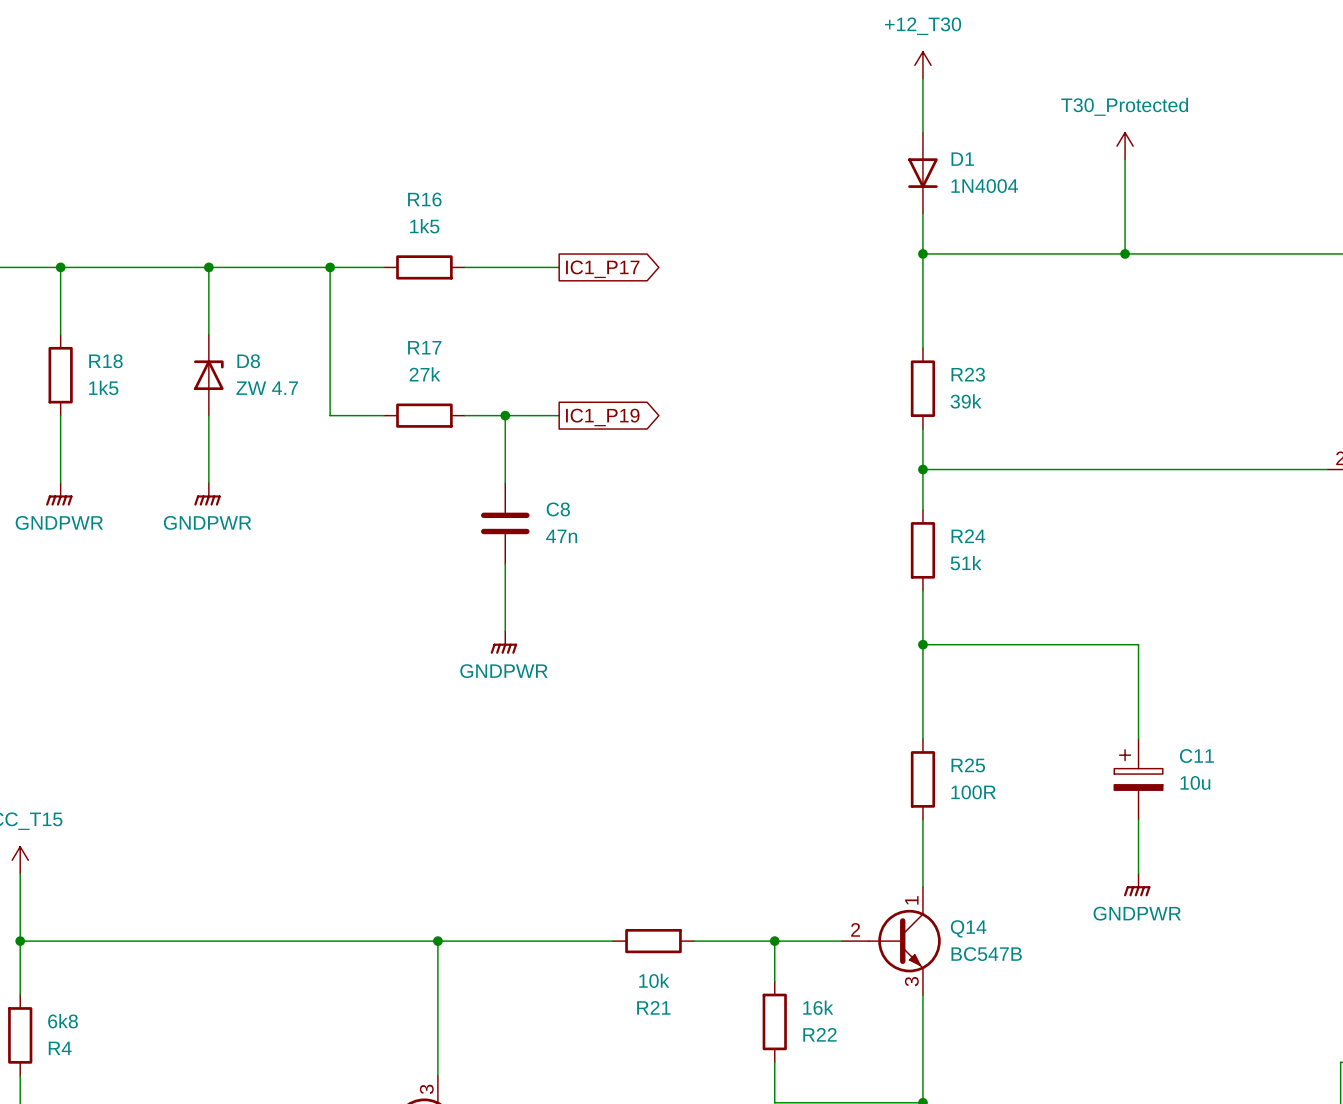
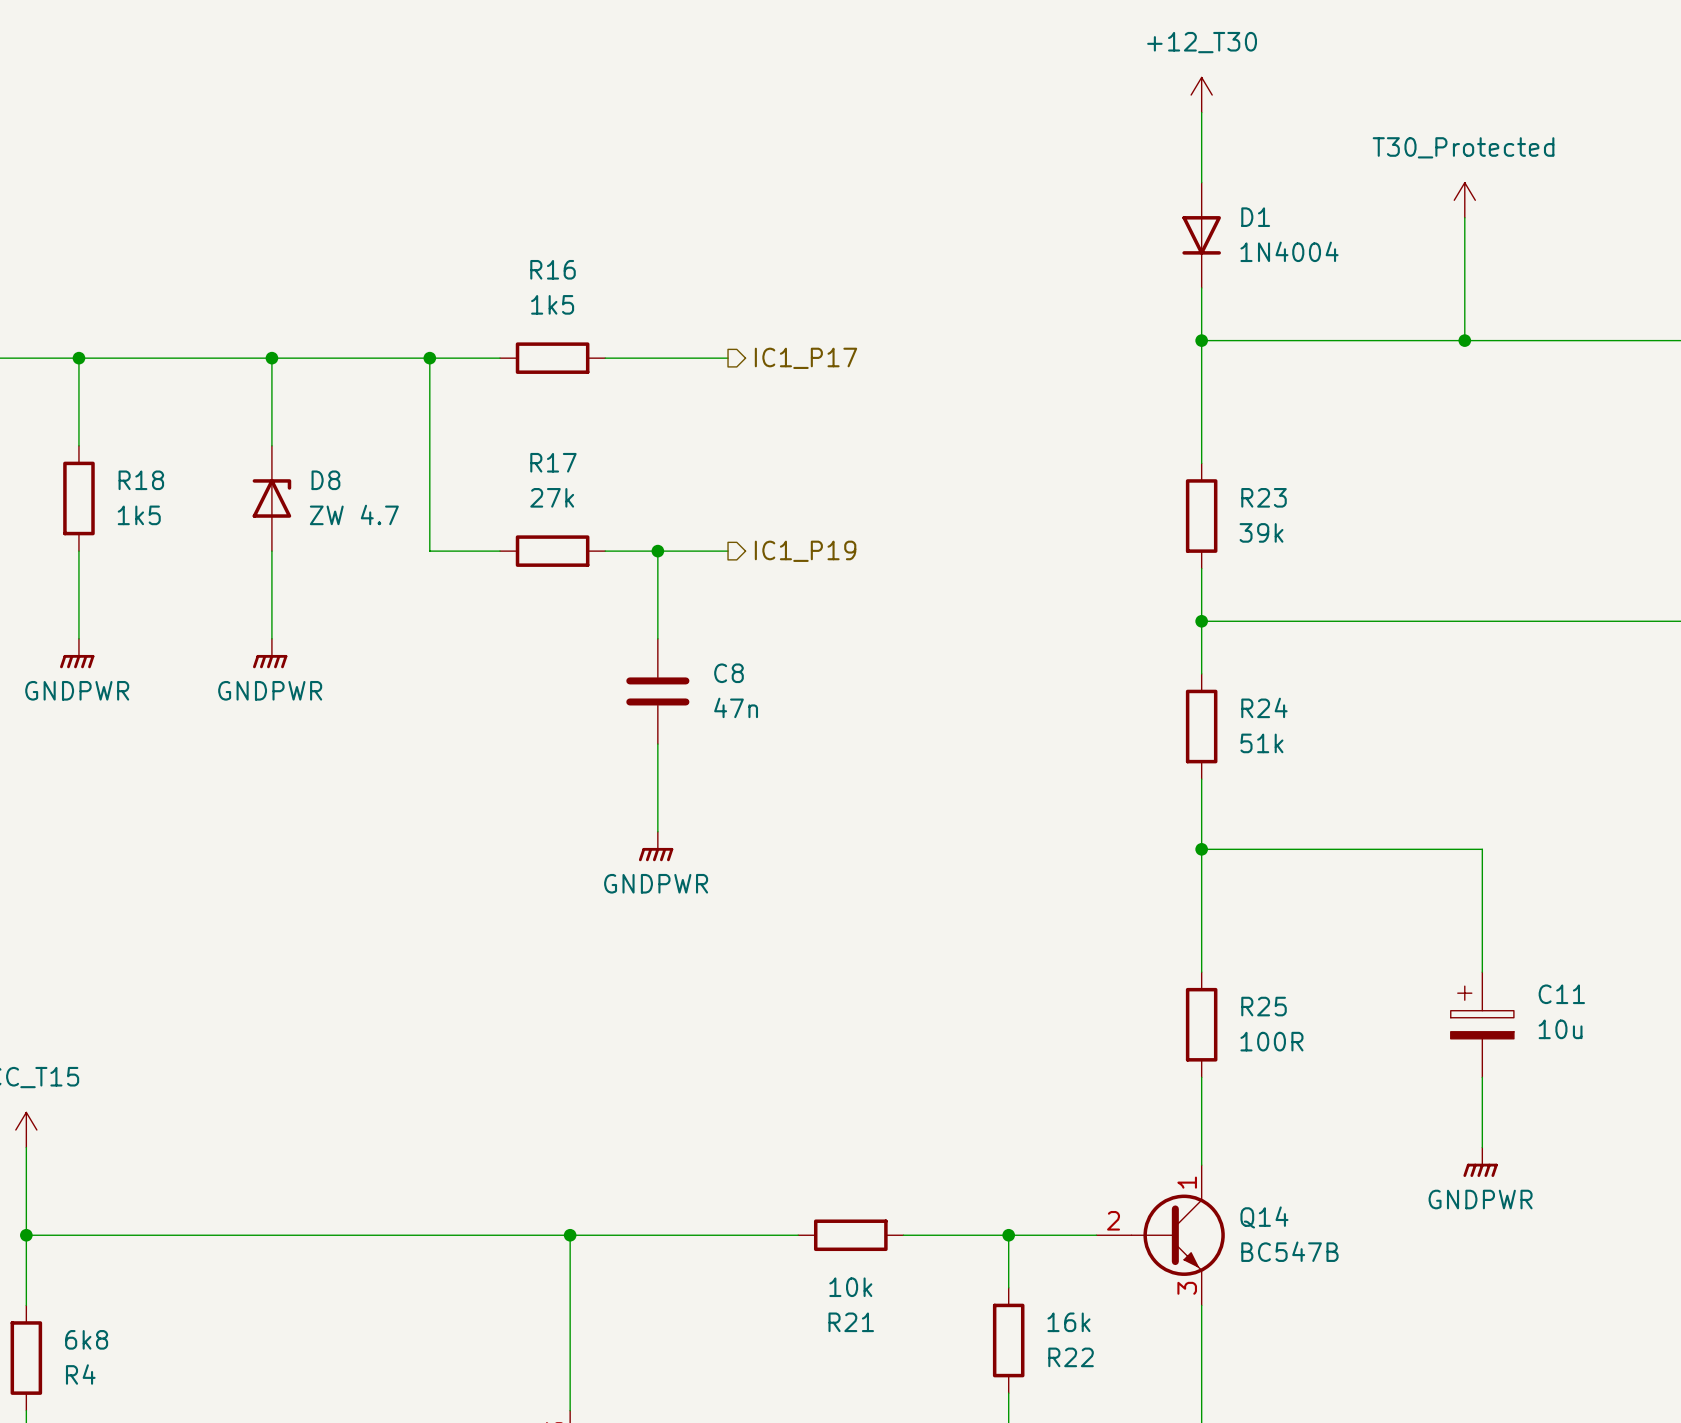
hierarchical label: none -> IC1_P17 (805, 358)
global label: IC1_P17 (602, 269) -> none
hierarchical label: none -> IC1_P19 (805, 551)
global label: IC1_P19 (602, 417) -> none

